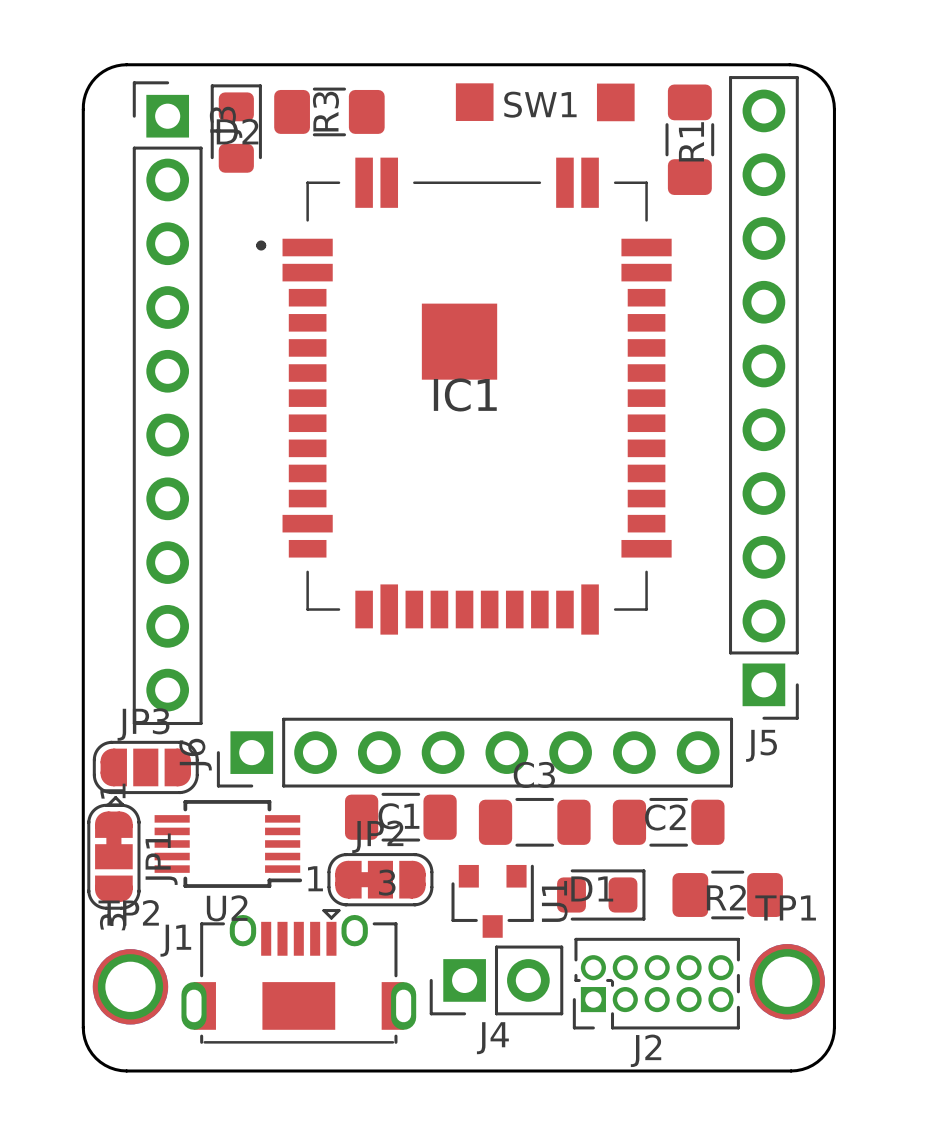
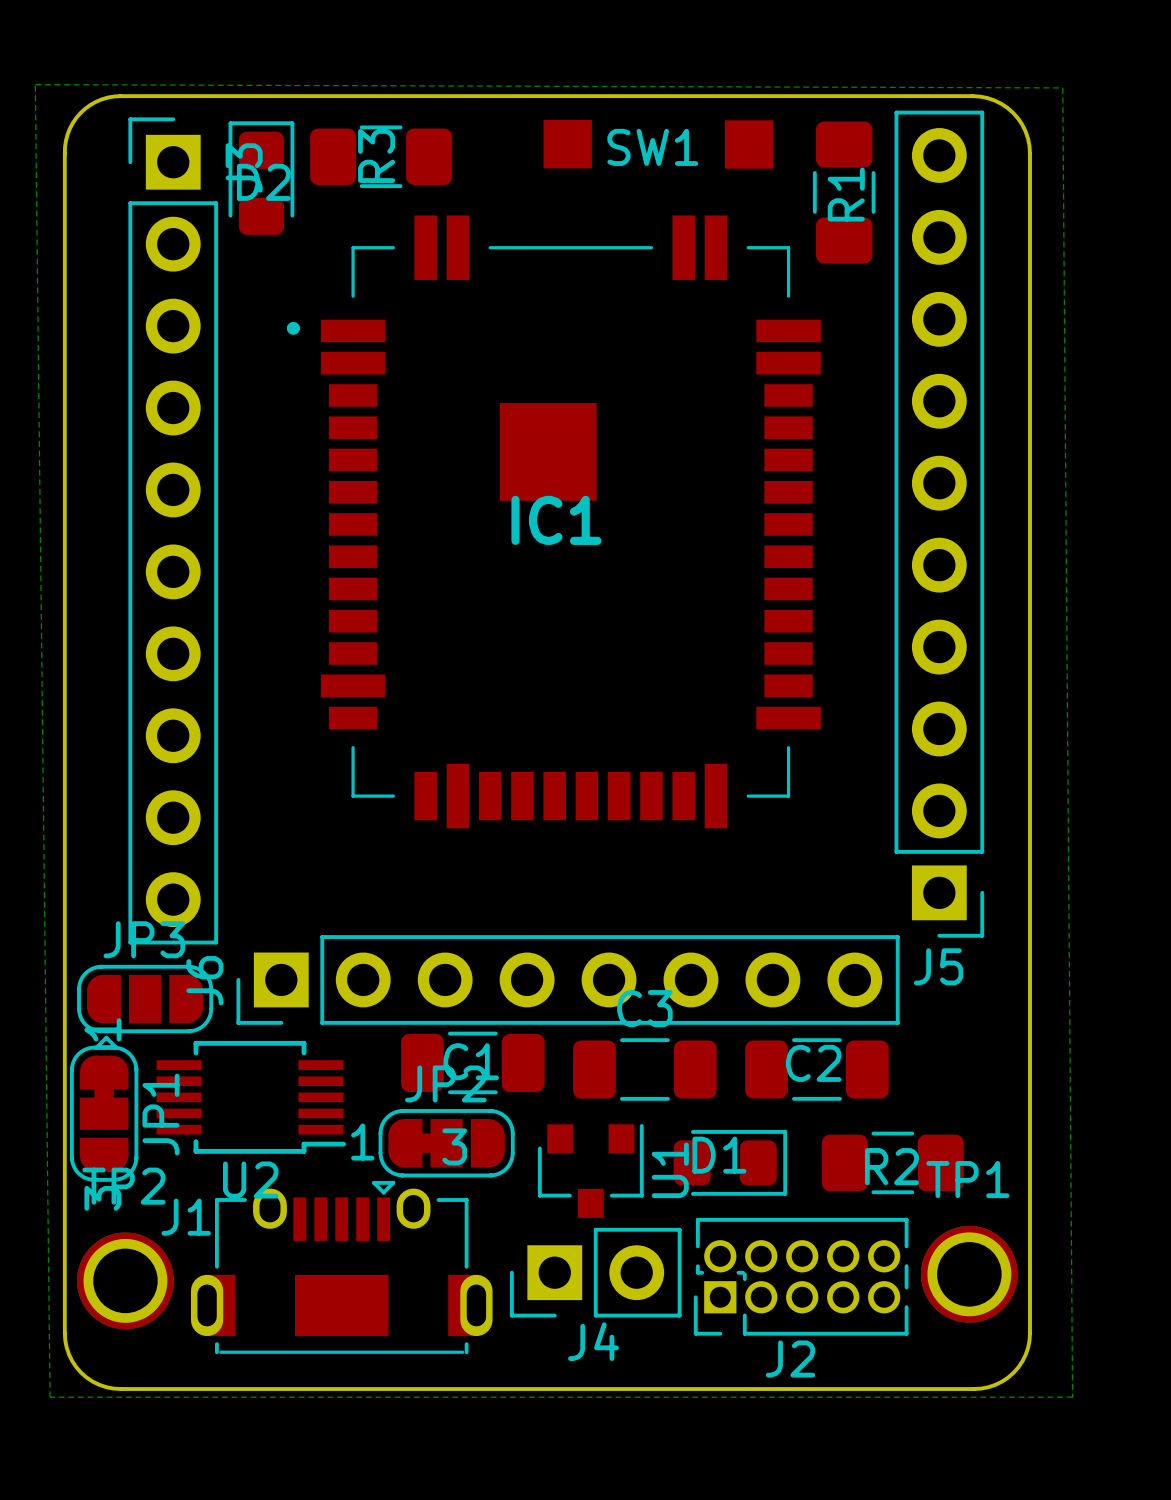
bottom zone outline: none -> (35, 84) (1062, 87) (1072, 1397) (50, 1397) (35, 84)

